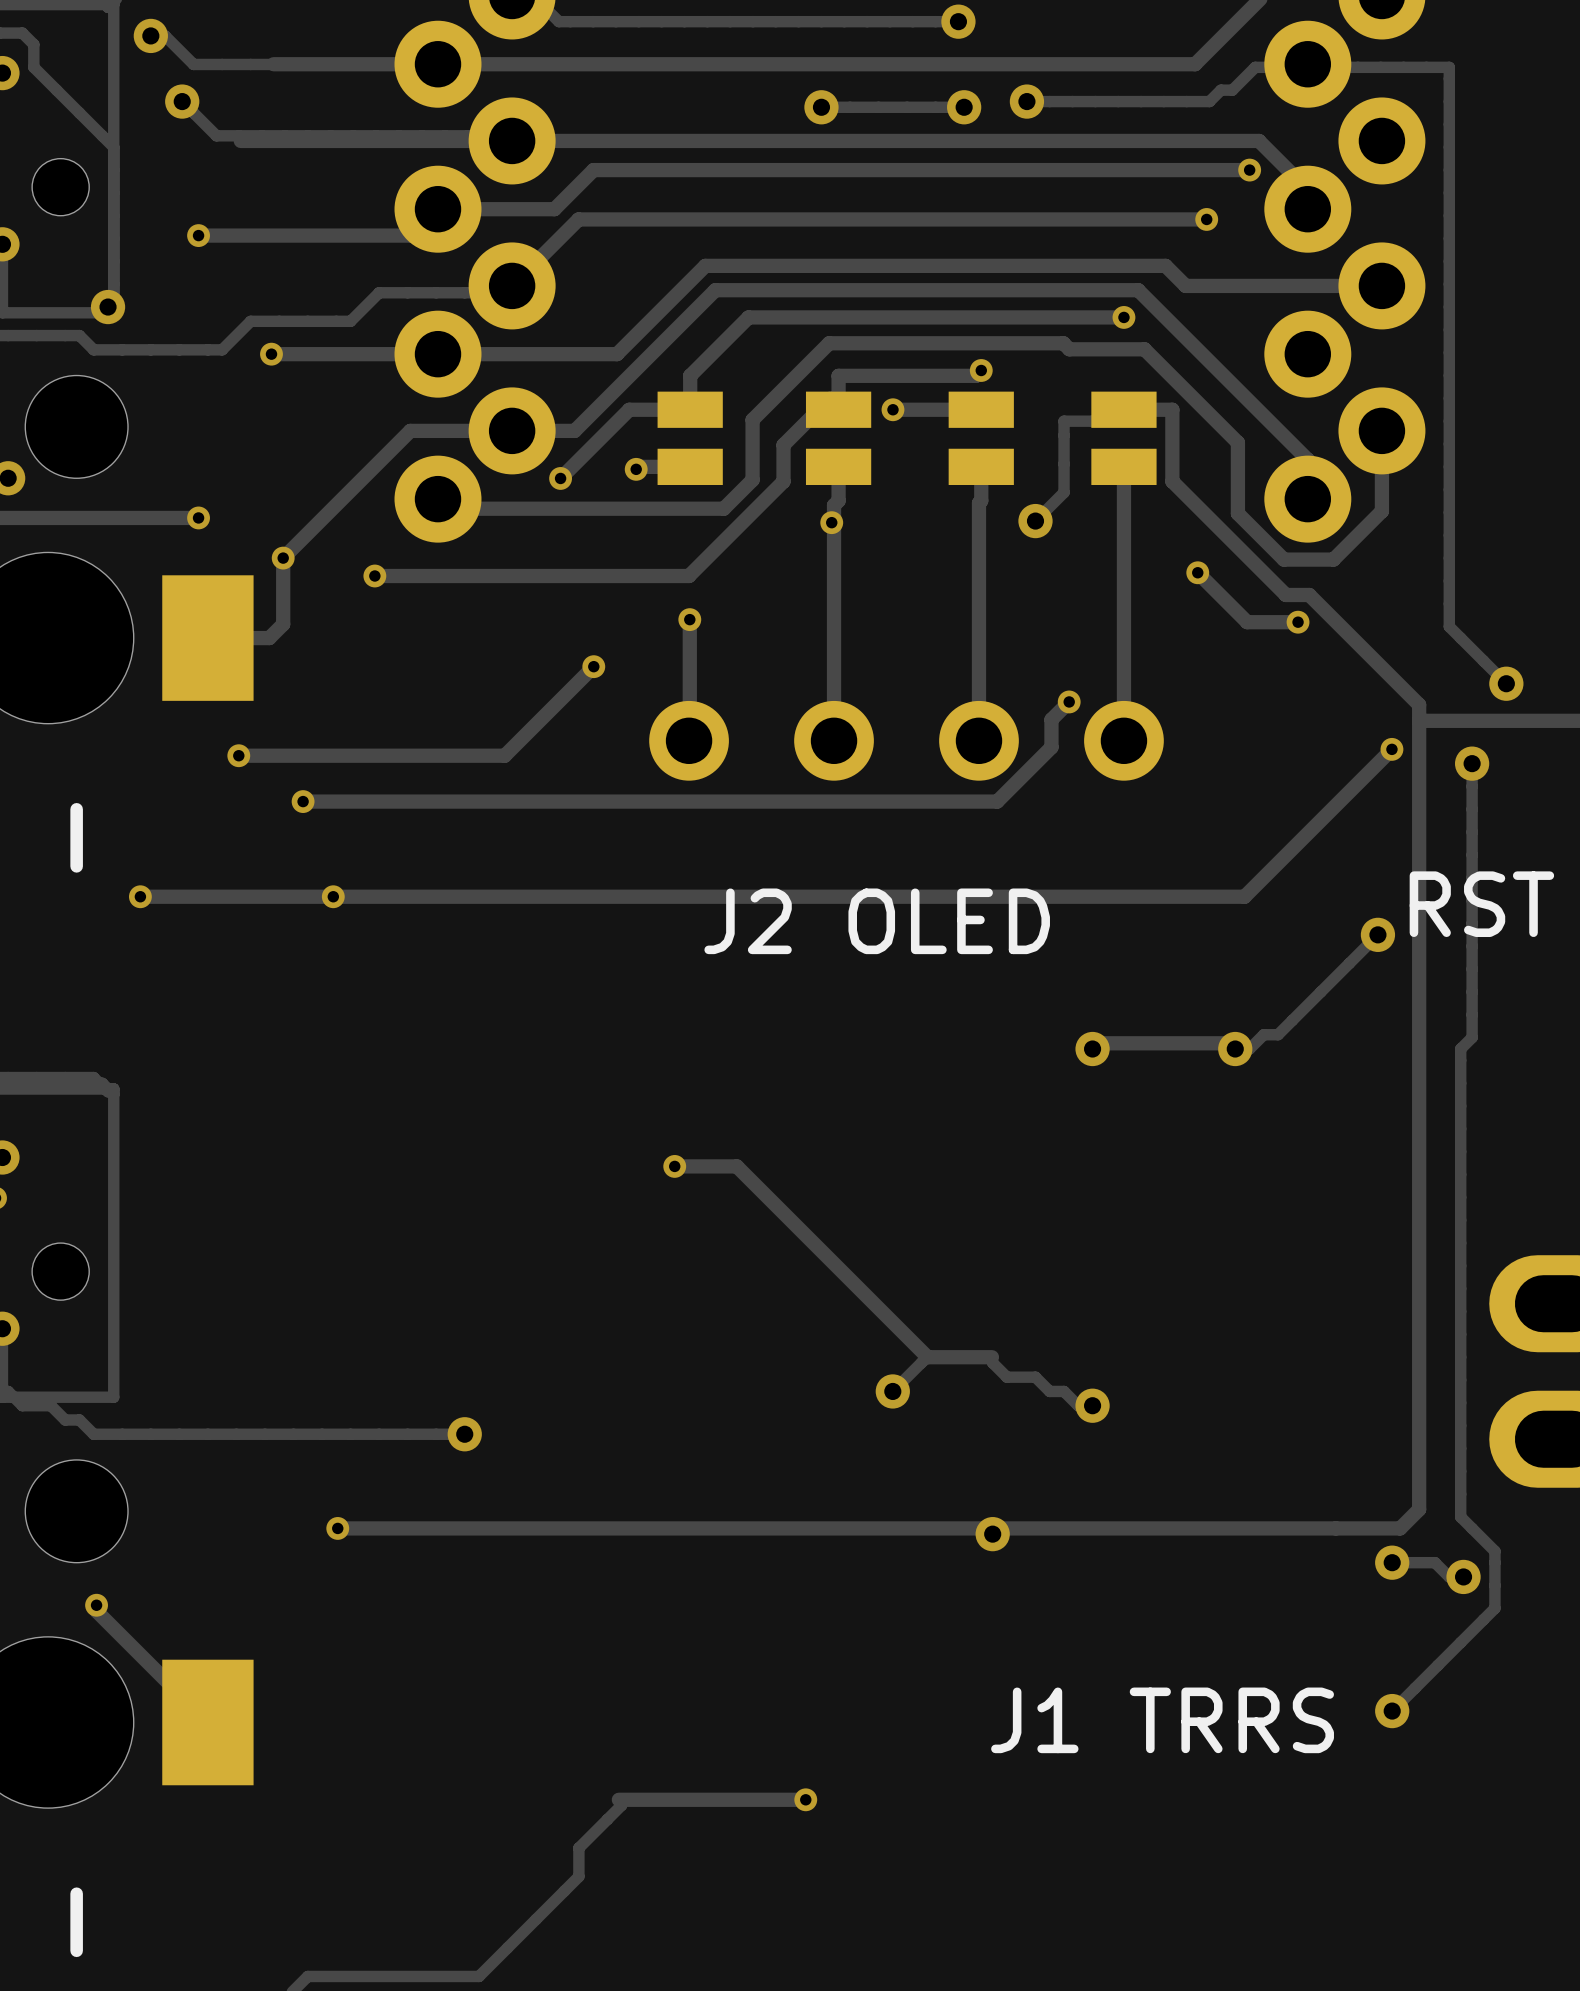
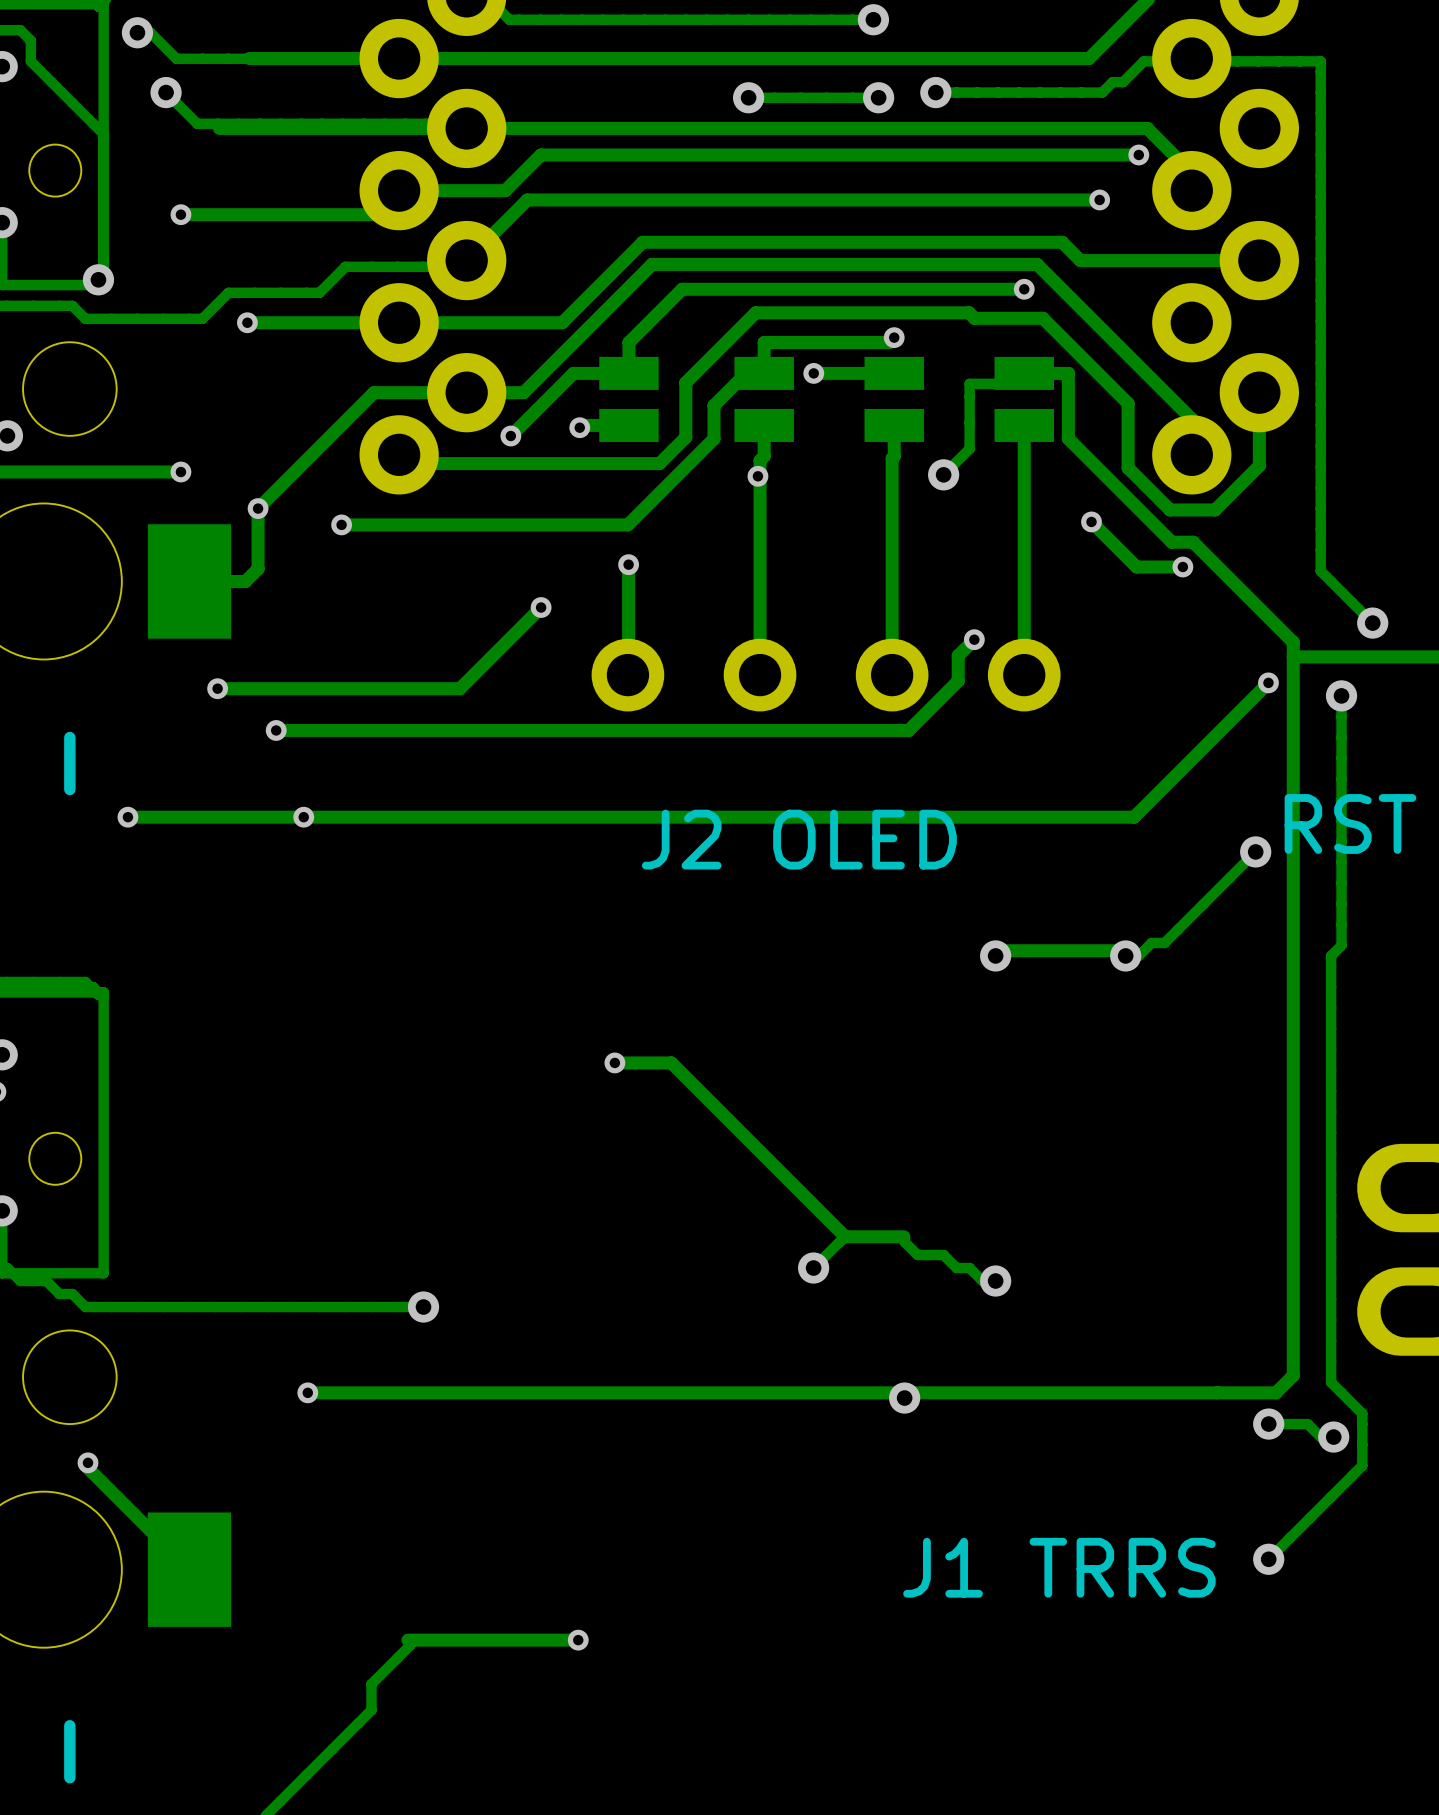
track: (618, 1799) (621, 1805) (578, 1848) (578, 1876) (479, 1976) (307, 1976) -> (563, 1640) (407, 1640) (410, 1645) (371, 1684) (371, 1710) (280, 1801)
track: (805, 1799) (634, 1799) -> none
via position: (805, 1799) -> (578, 1640)

